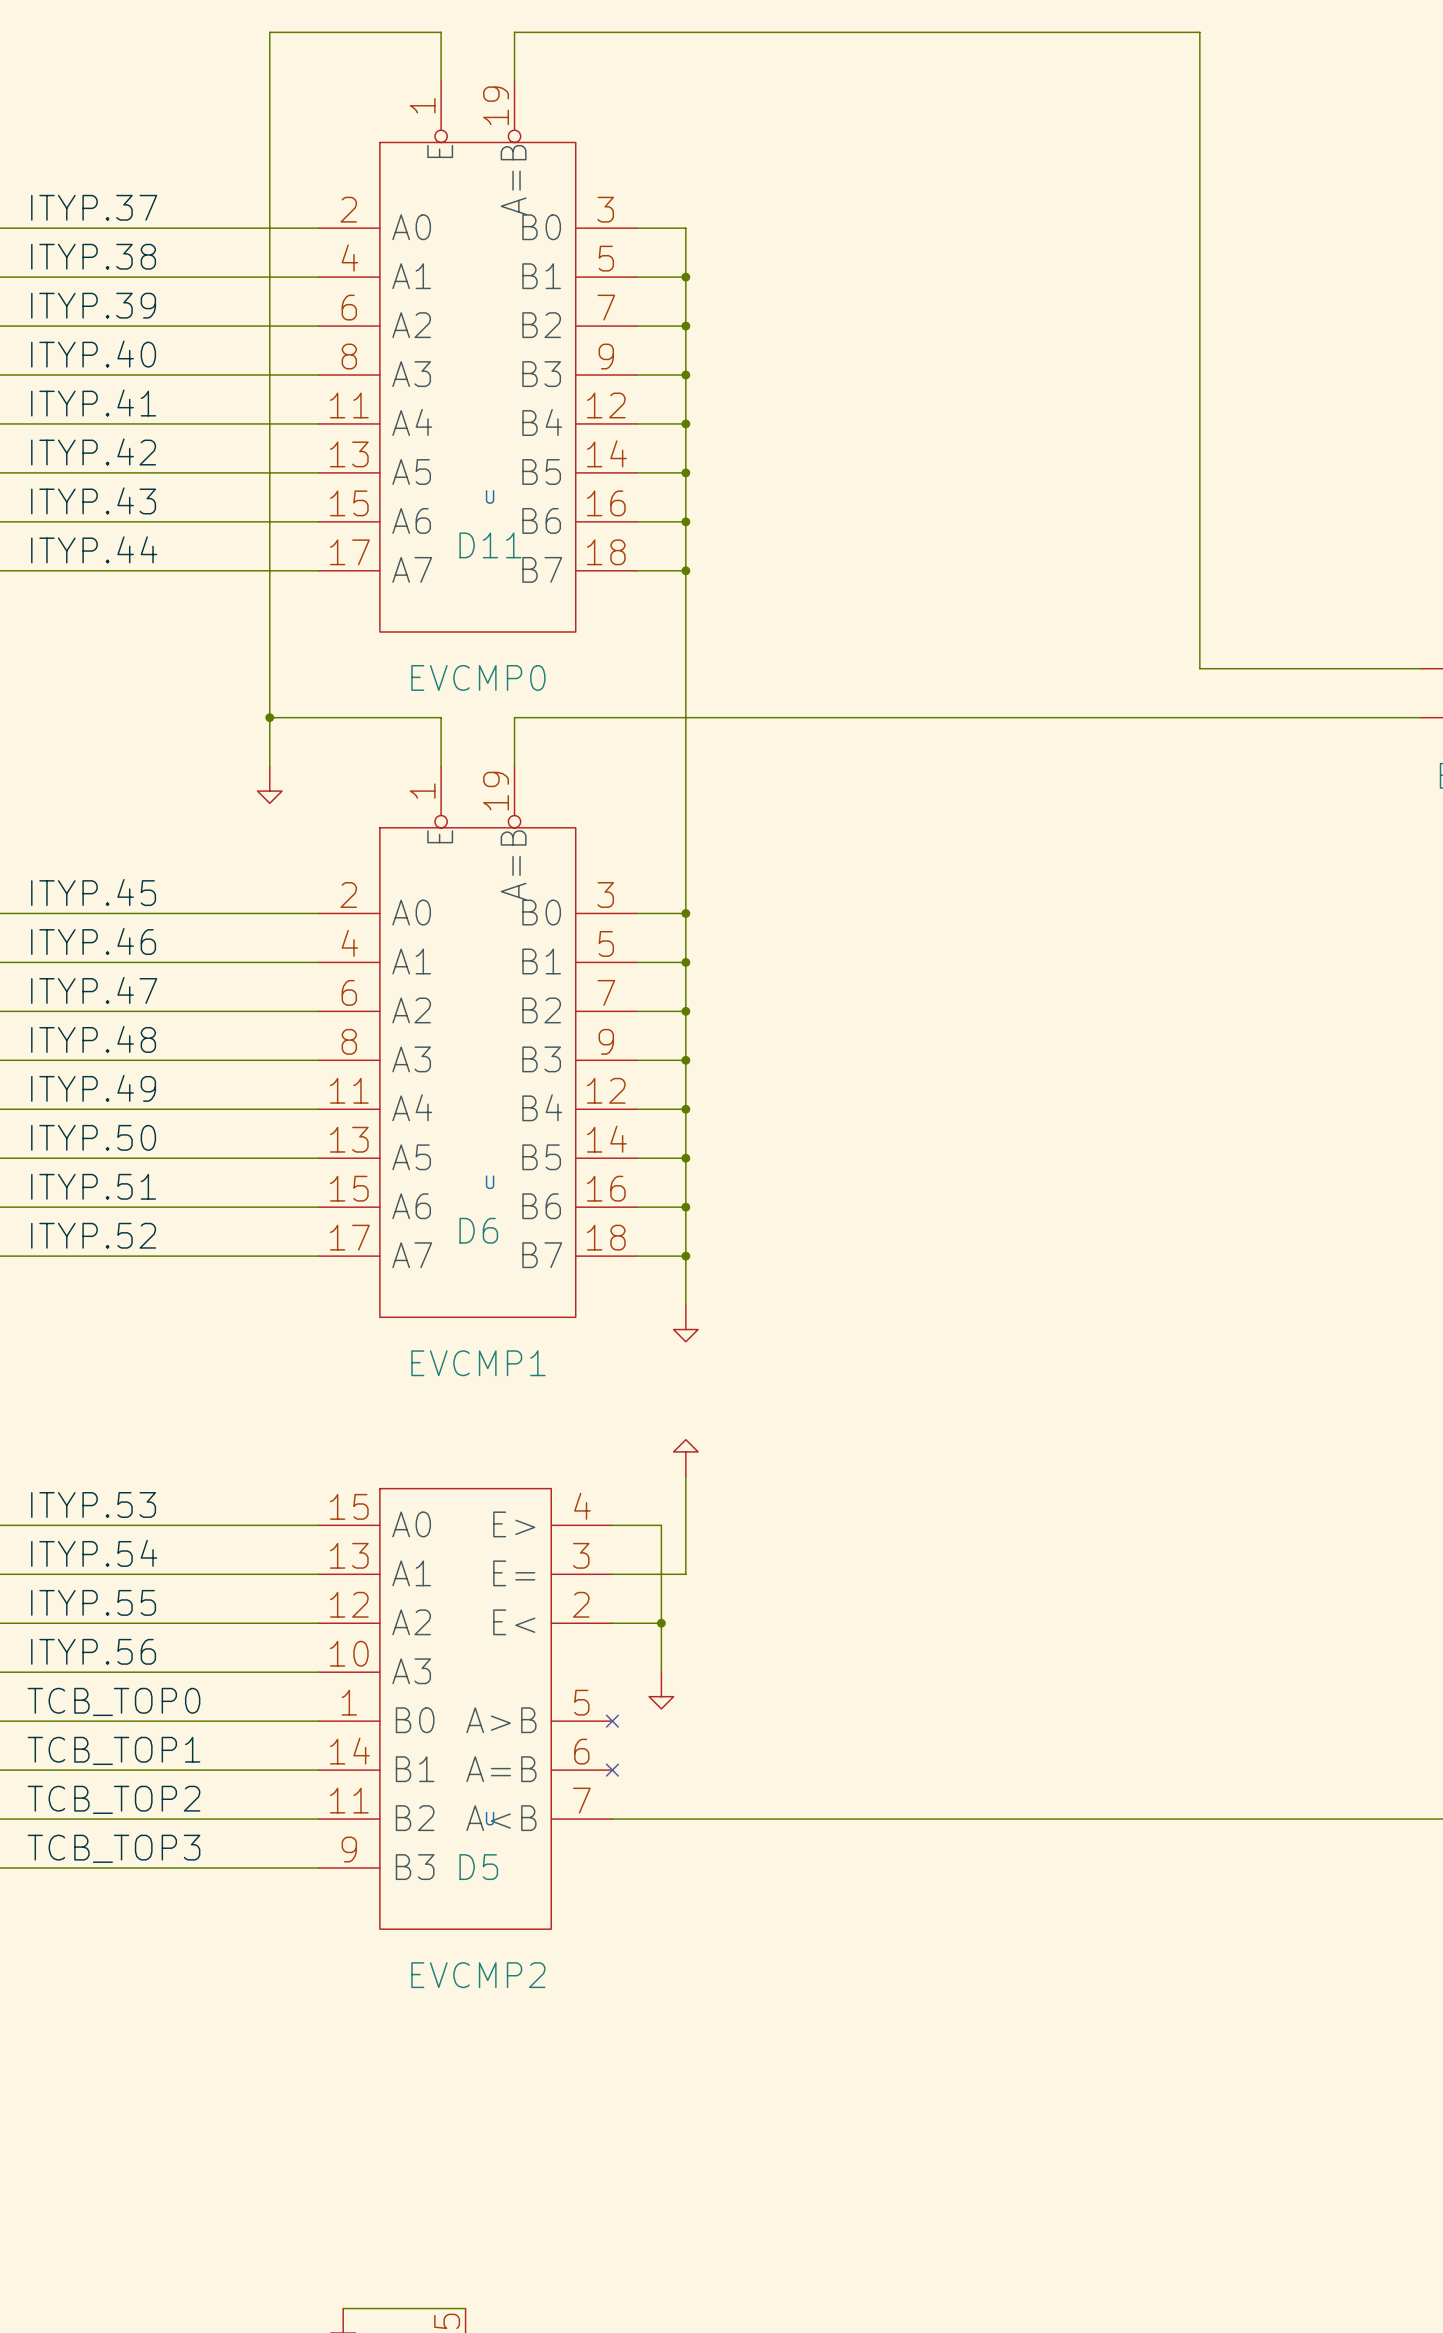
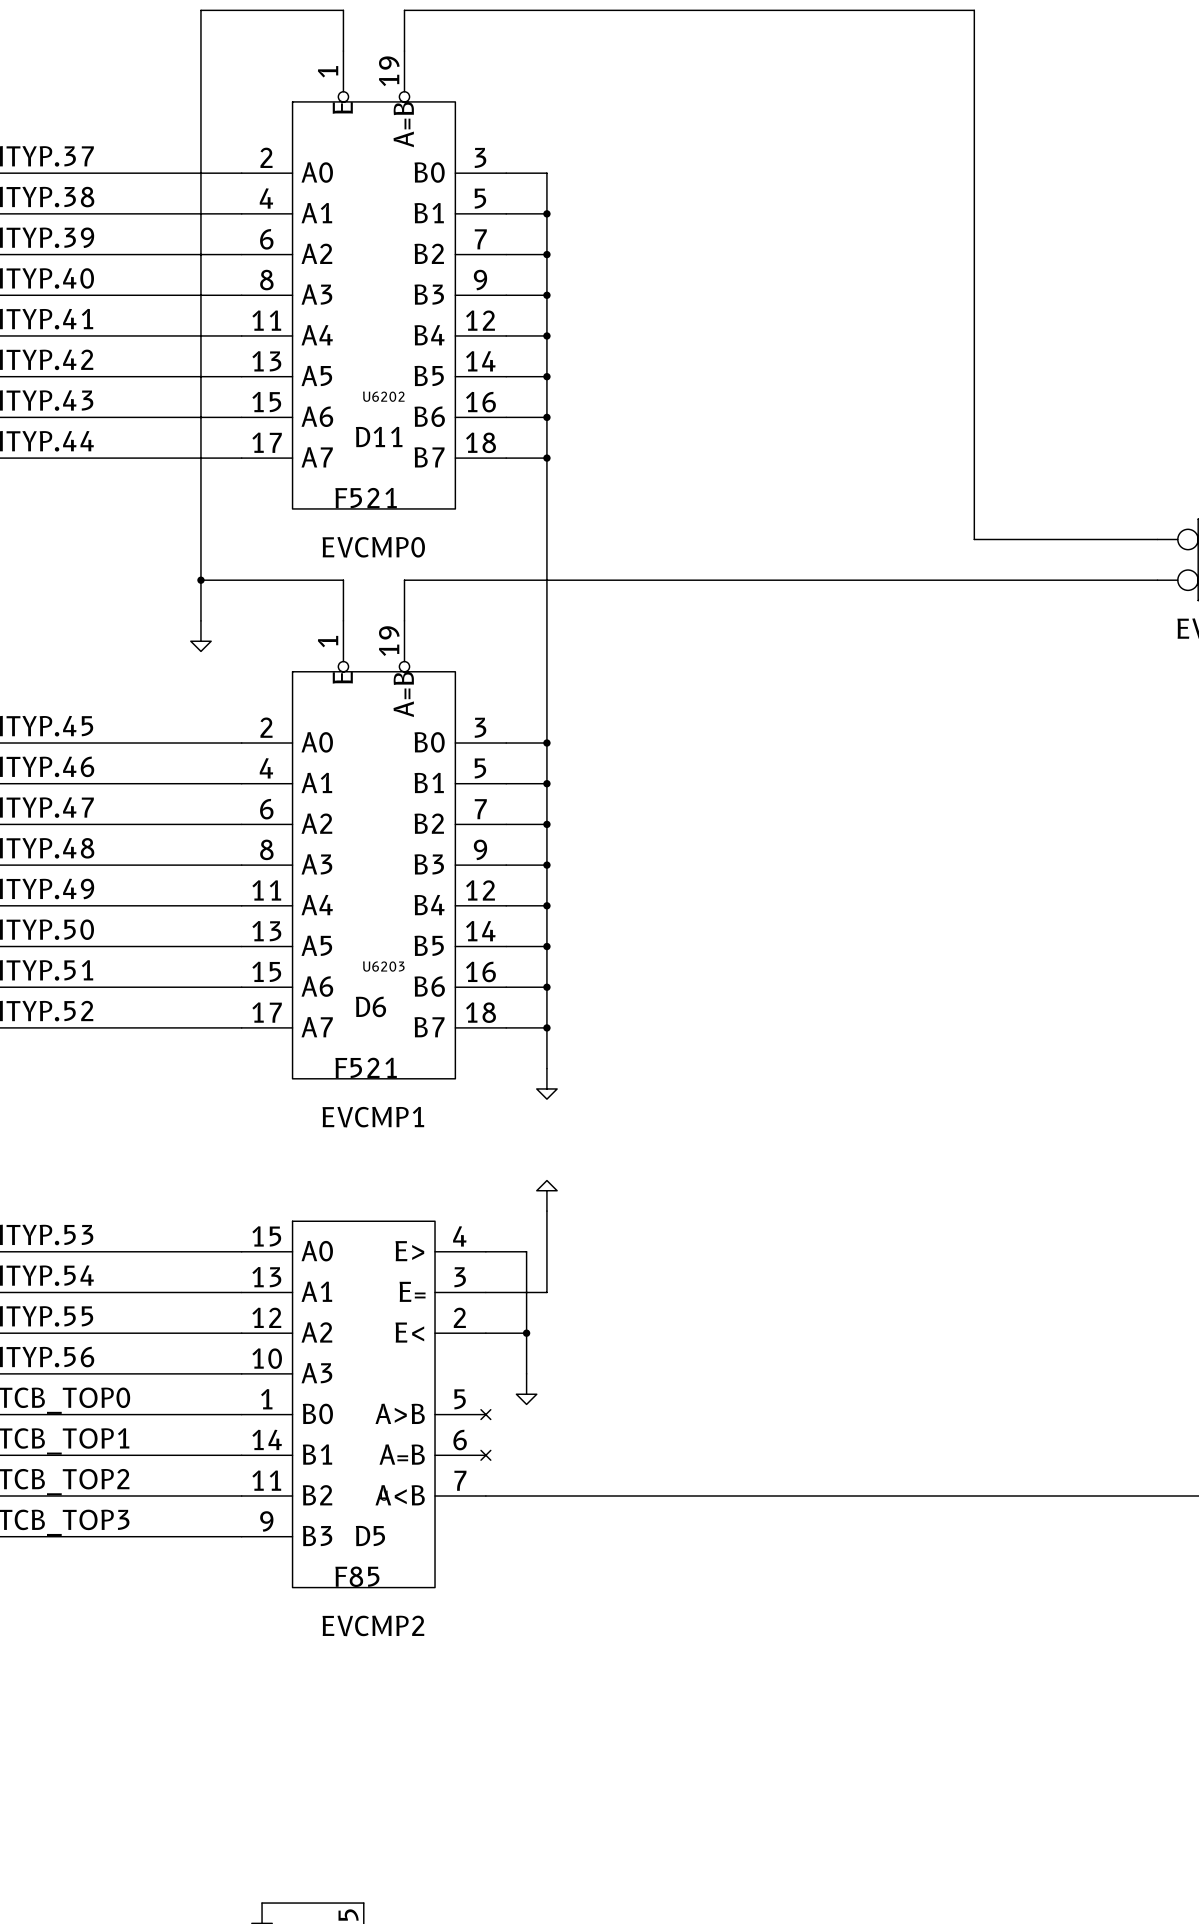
U name: U (490, 496) -> U6202 (383, 396)
U value: none -> F521 (366, 498)
U name: U (490, 1182) -> U6203 (383, 966)
U value: none -> F521 (366, 1067)
U value: none -> F85 (357, 1576)

